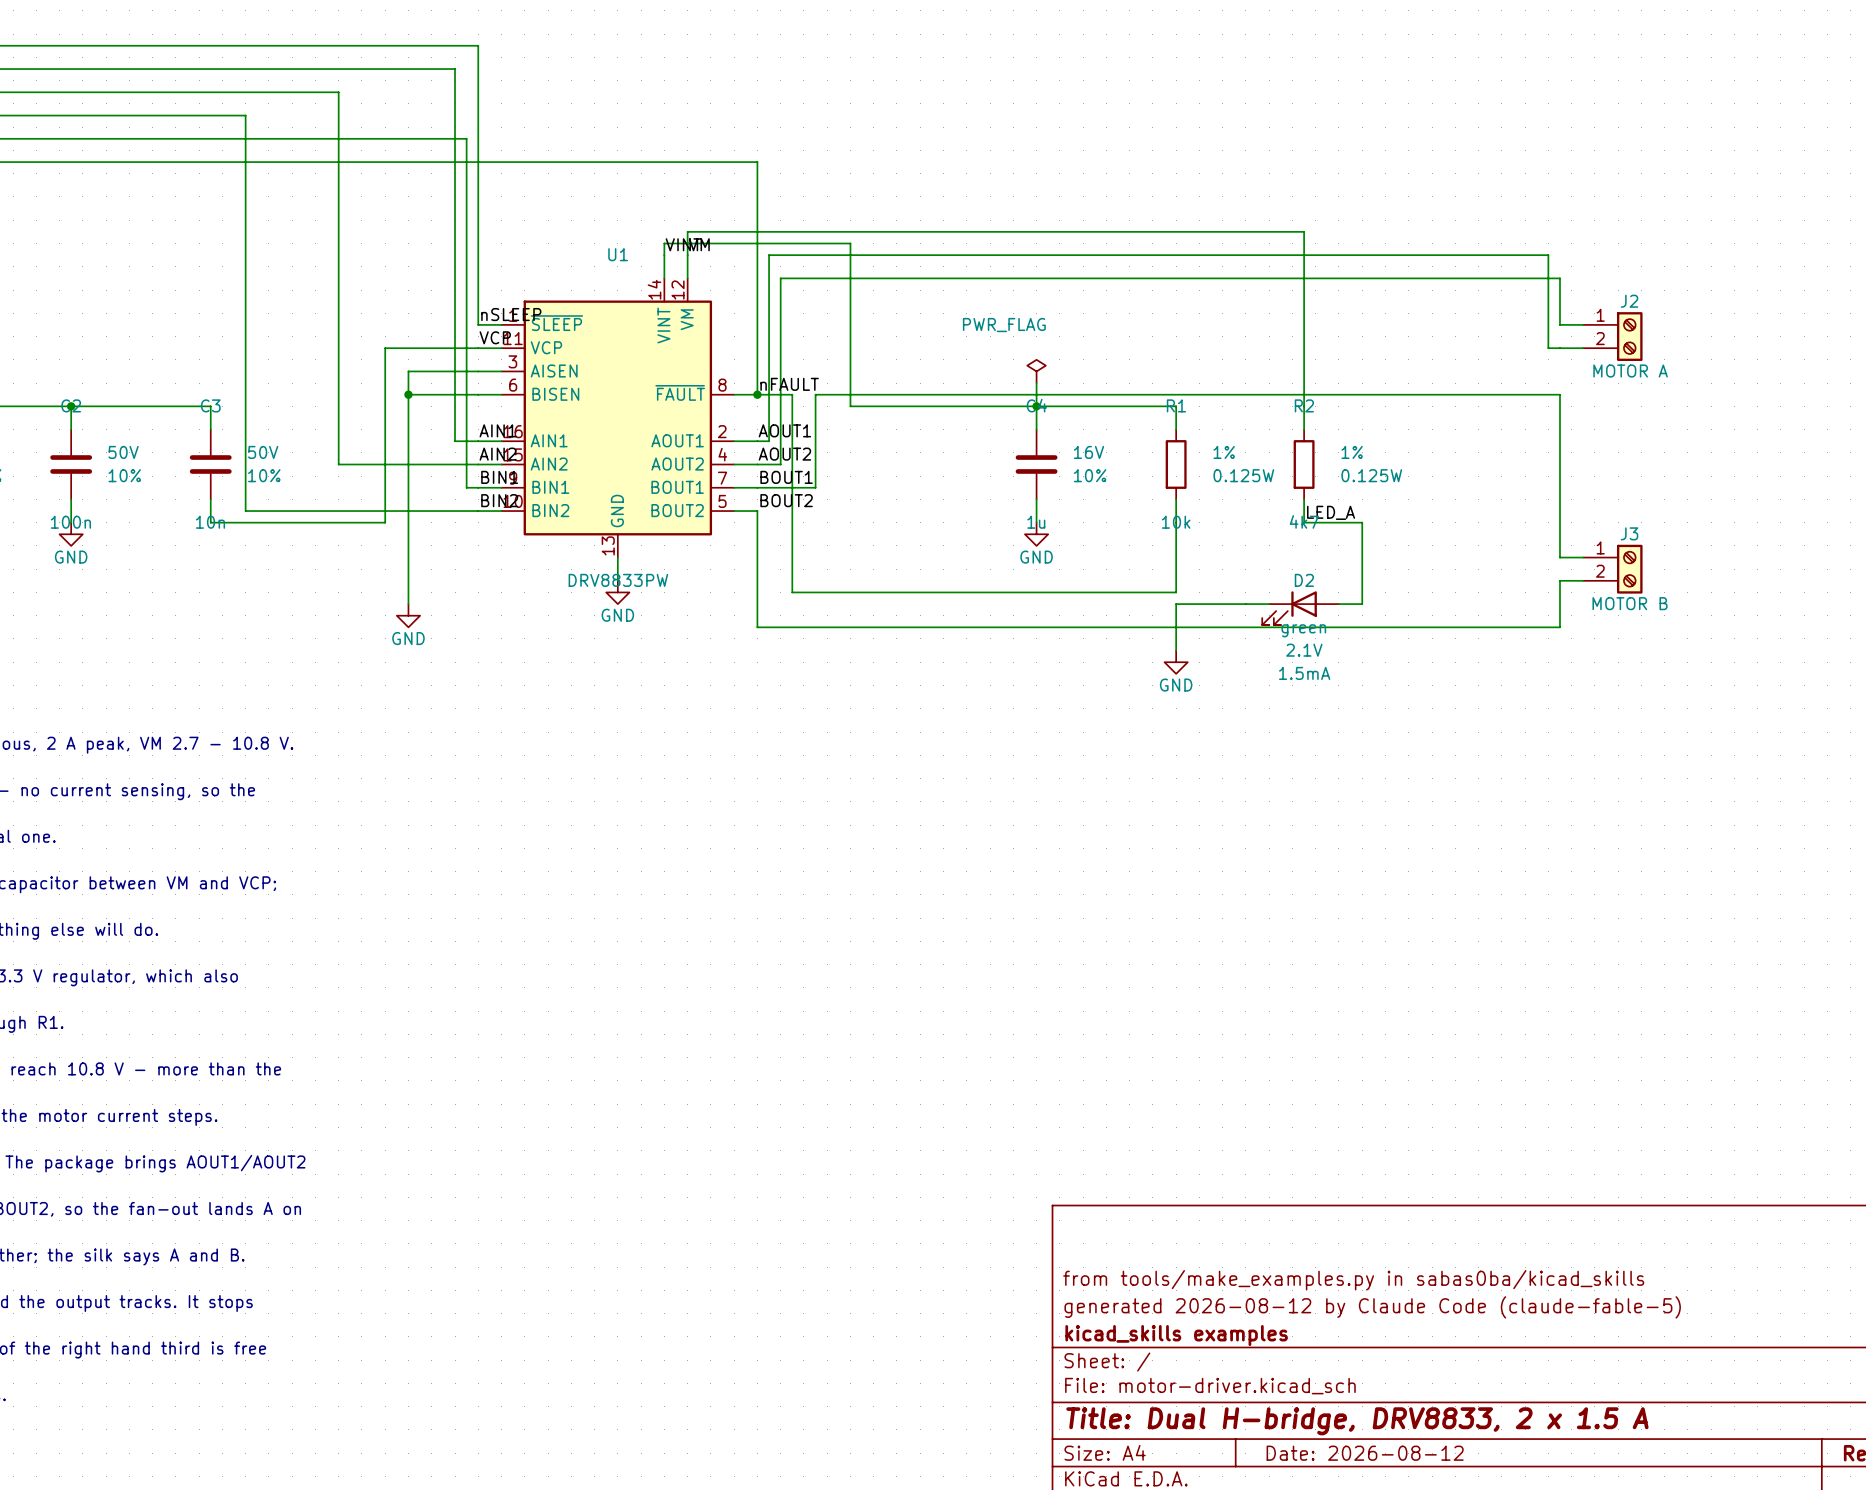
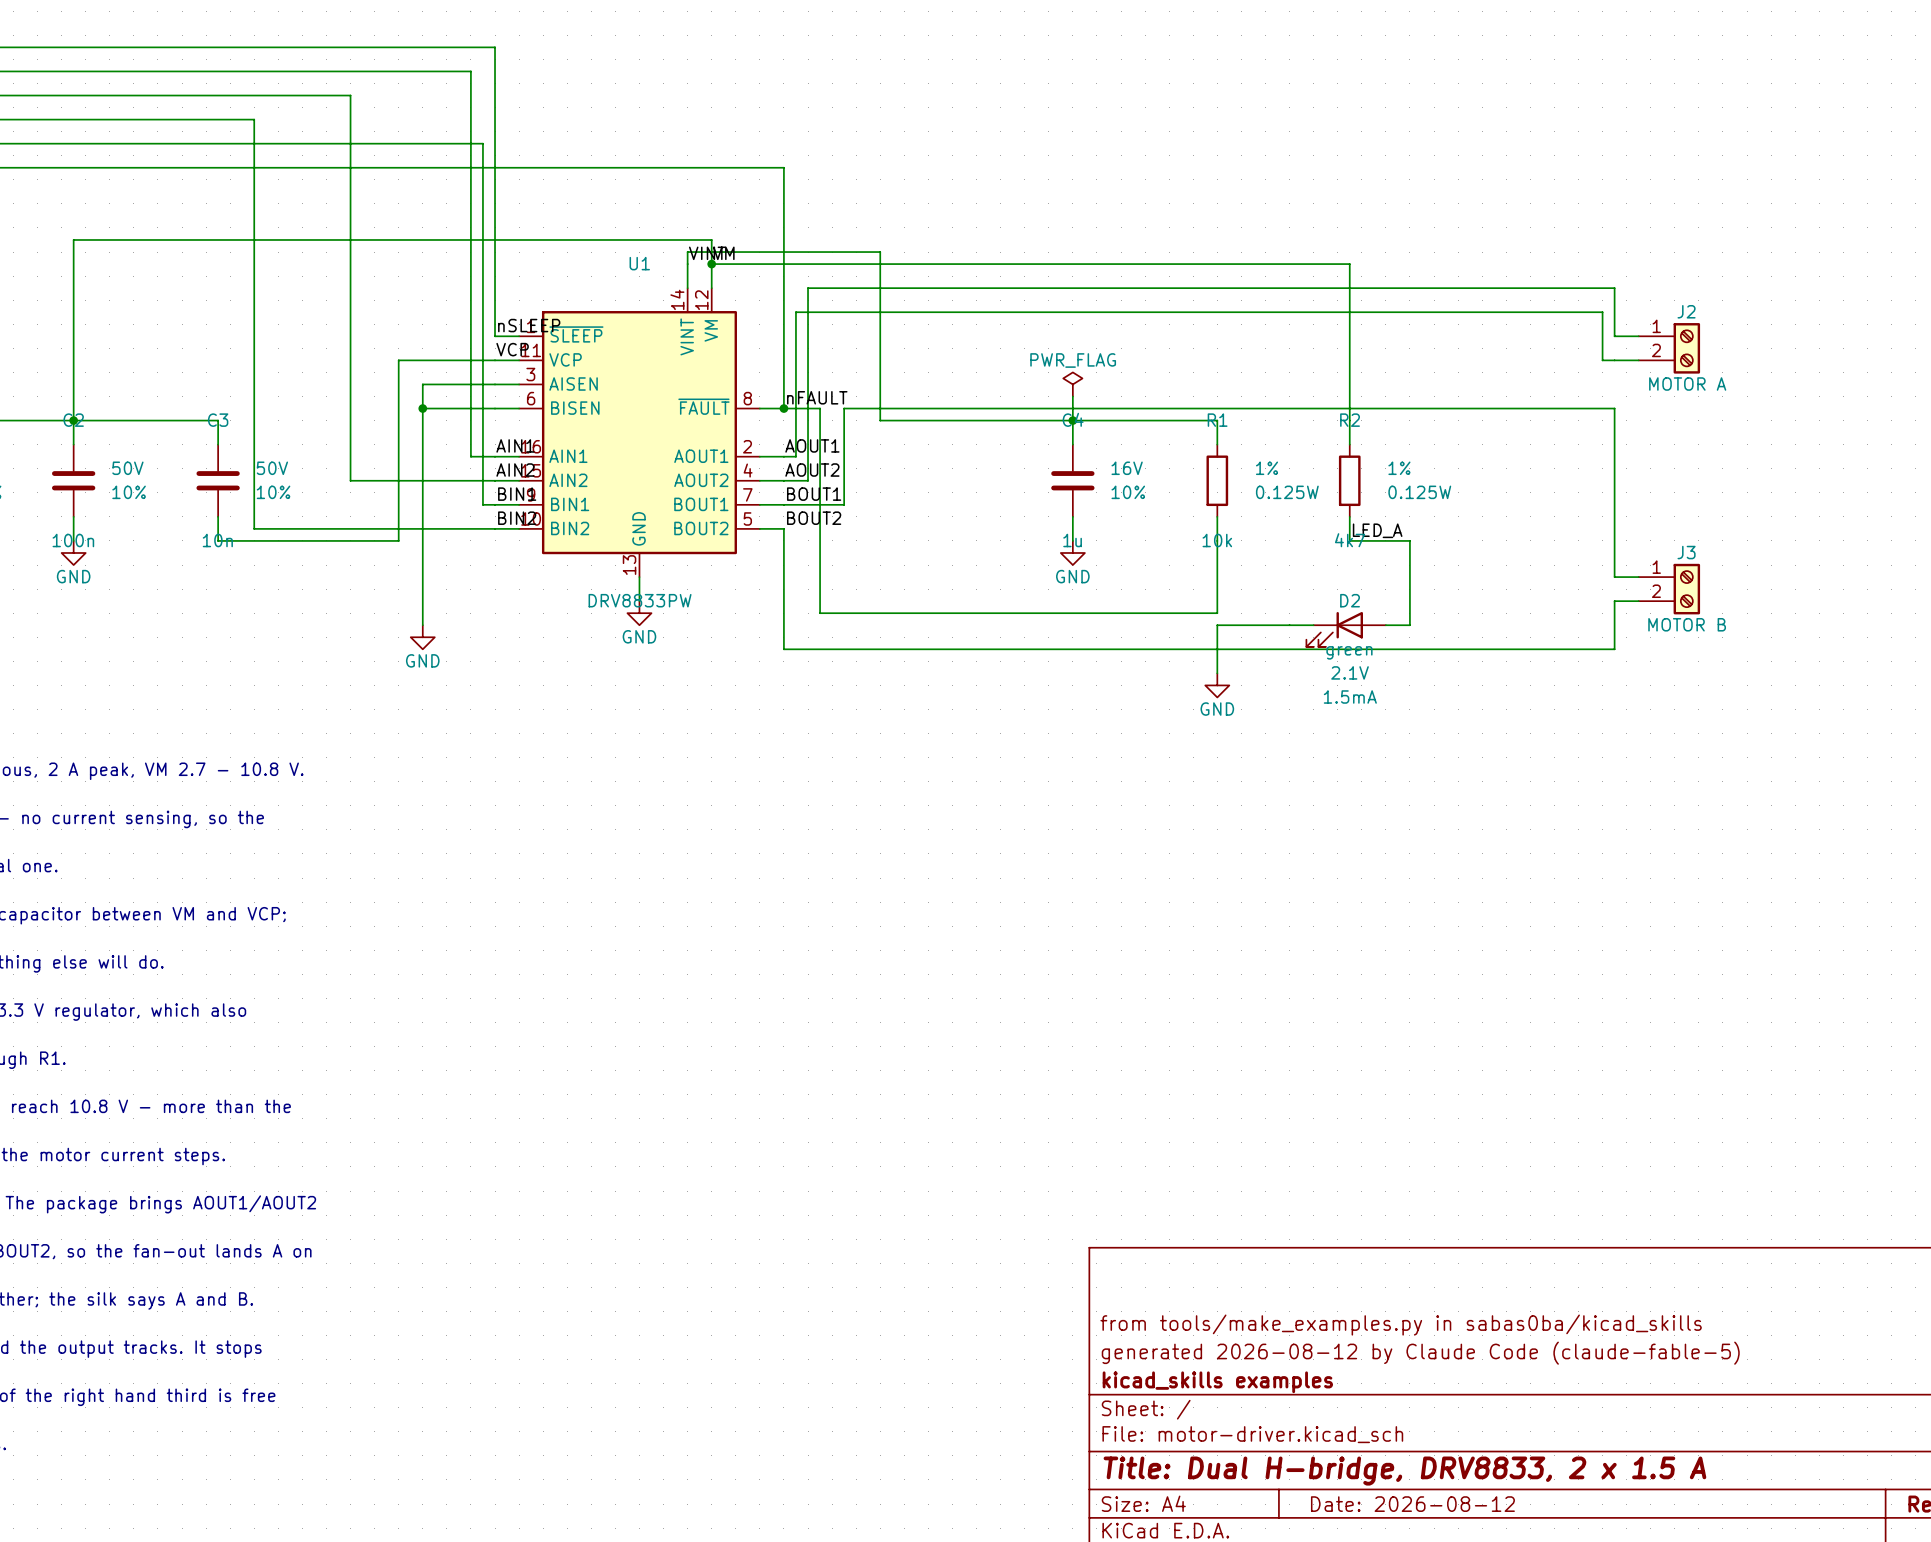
wire: (687, 231) (1304, 231) (1304, 255) (1548, 255) (1548, 301) -> (795, 312) (1602, 312)
wire: none -> (711, 239) (73, 239) (73, 420)
junction: none -> (711, 264)
wire: (769, 255) (769, 301) -> (795, 264) (711, 264)
power symbol text position: PWR_FLAG (1004, 325) -> PWR_FLAG (1073, 360)

